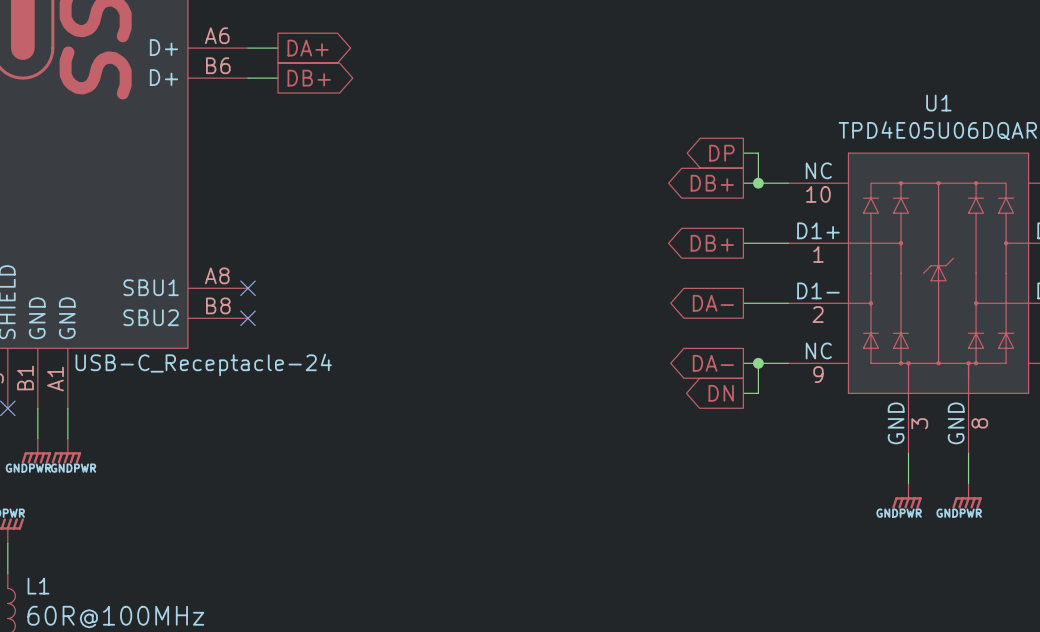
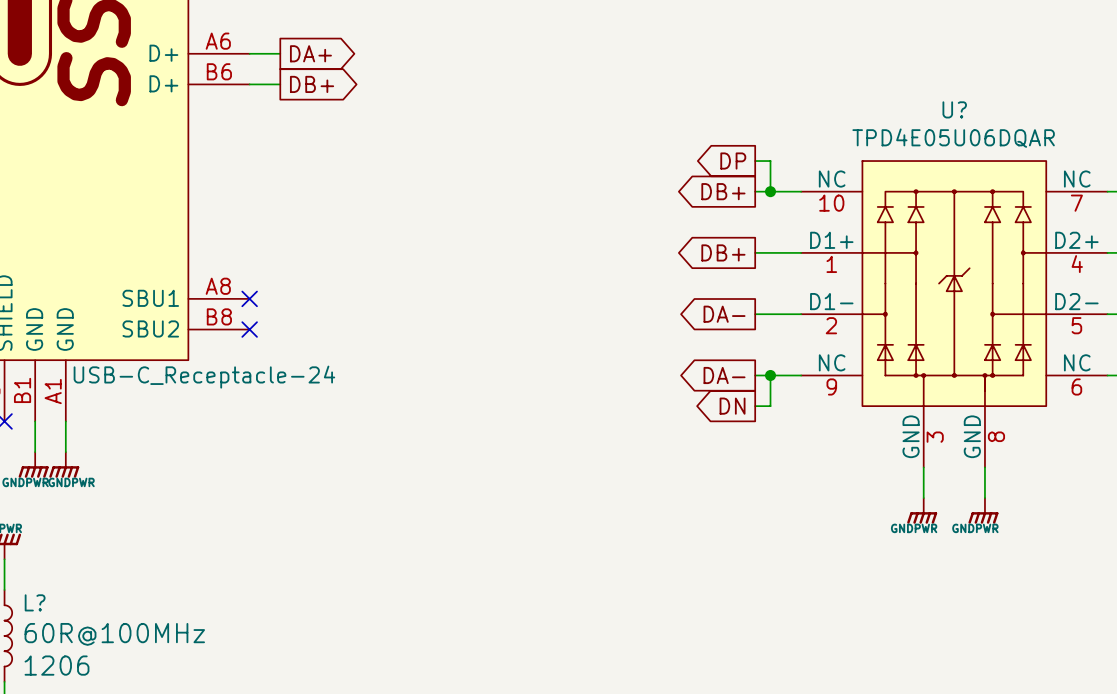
U1 name: U1 (938, 103) -> U? (954, 109)
L1 name: L1 (38, 586) -> L? (35, 602)

